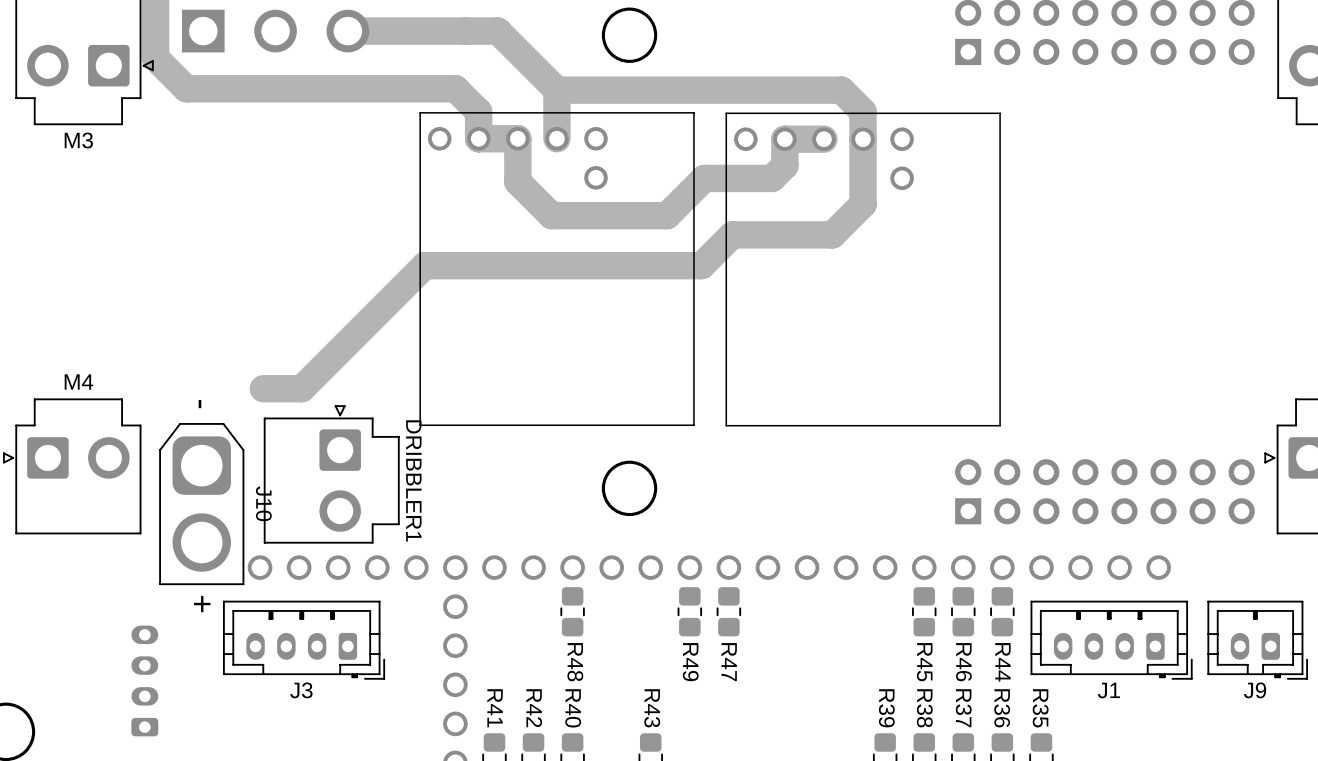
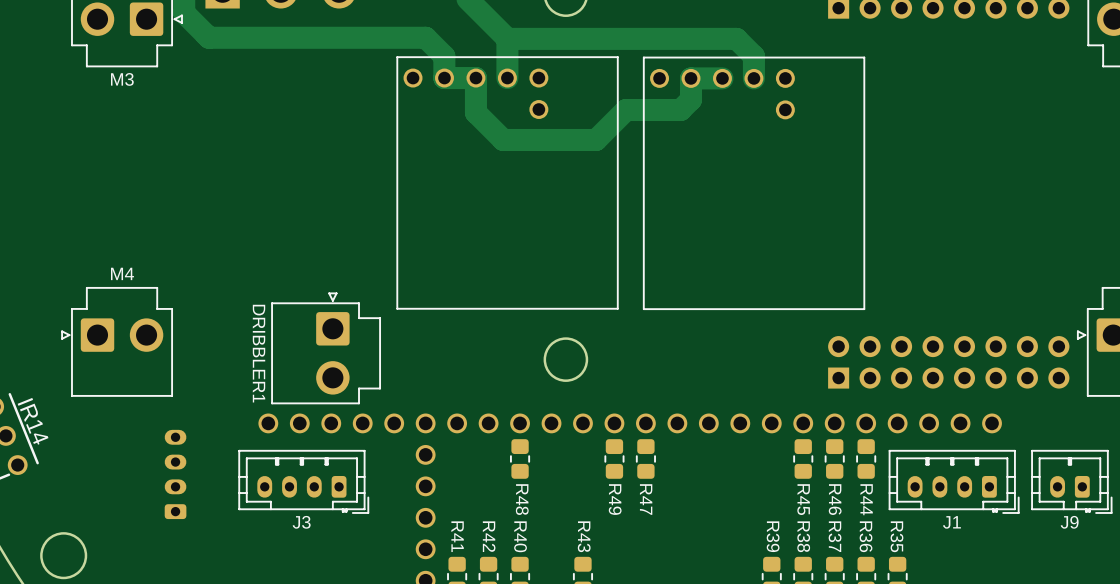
track: (863, 139) (863, 204) (832, 234) (732, 234) (701, 265) (424, 265) (301, 388) (263, 388) -> none
DRIBBLER1 name position: DRIBBLER1 (413, 480) -> DRIBBLER1 (259, 353)
J10: (201, 504) -> none
part position: (144, 680) -> (175, 474)

